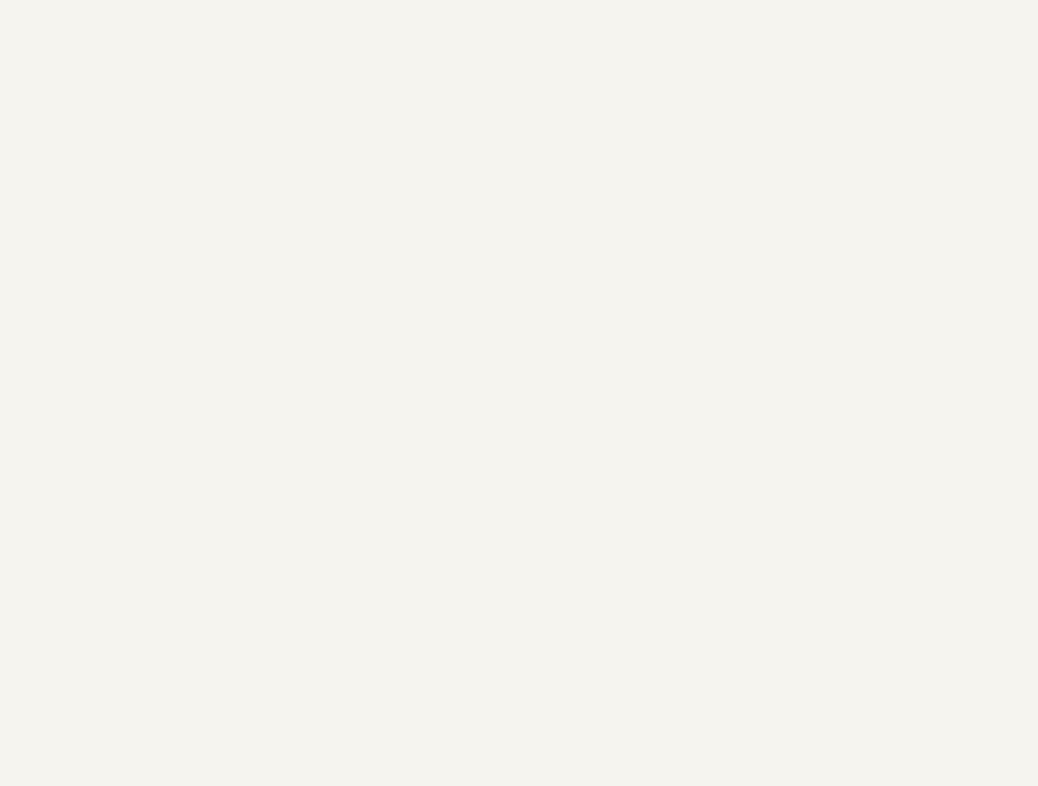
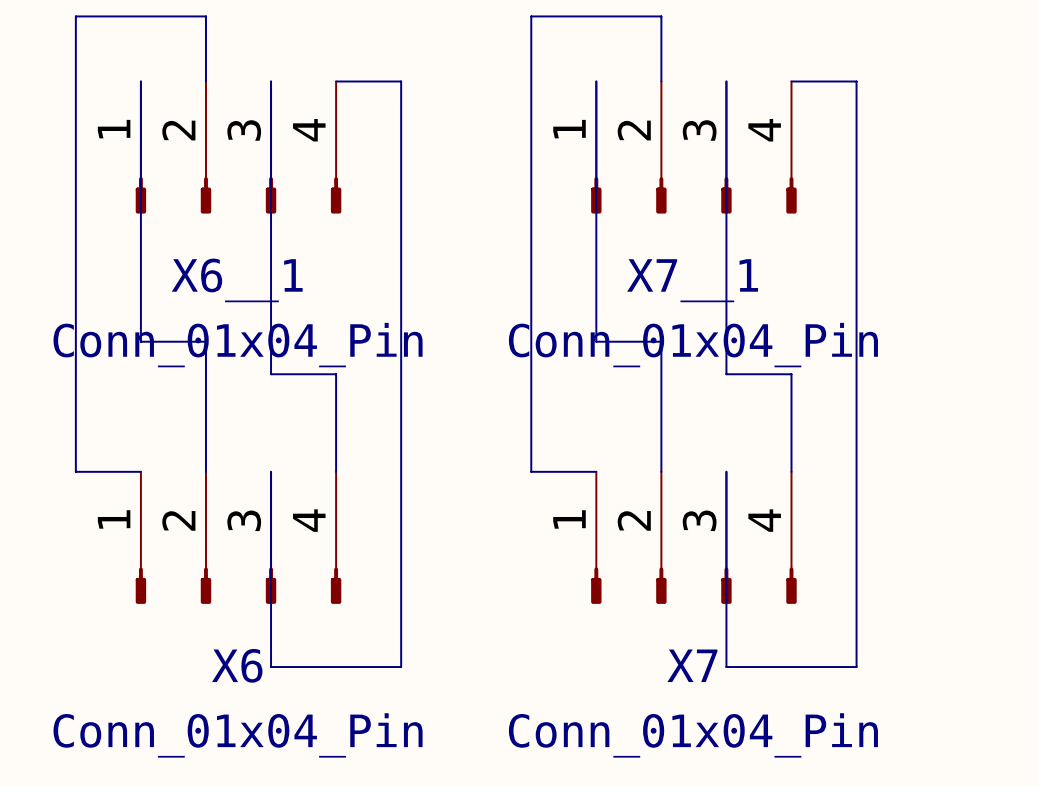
wire: none -> (140, 81) (140, 341) (205, 341) (205, 471)
wire: none -> (205, 81) (205, 16) (75, 16) (75, 471) (140, 471)
wire: none -> (271, 81) (271, 374) (336, 374) (336, 471)
wire: none -> (336, 81) (401, 81) (401, 667) (271, 667) (271, 471)
wire: none -> (596, 81) (596, 341) (661, 341) (661, 471)
wire: none -> (661, 81) (661, 16) (531, 16) (531, 471) (596, 471)
wire: none -> (726, 81) (726, 374) (791, 374) (791, 471)
wire: none -> (791, 81) (856, 81) (856, 667) (726, 667) (726, 471)
X6__1: none -> Conn_01x04_Pin (238, 147)
X7__1: none -> Conn_01x04_Pin (693, 147)
X6: none -> Conn_01x04_Pin (238, 537)
X7: none -> Conn_01x04_Pin (693, 537)

